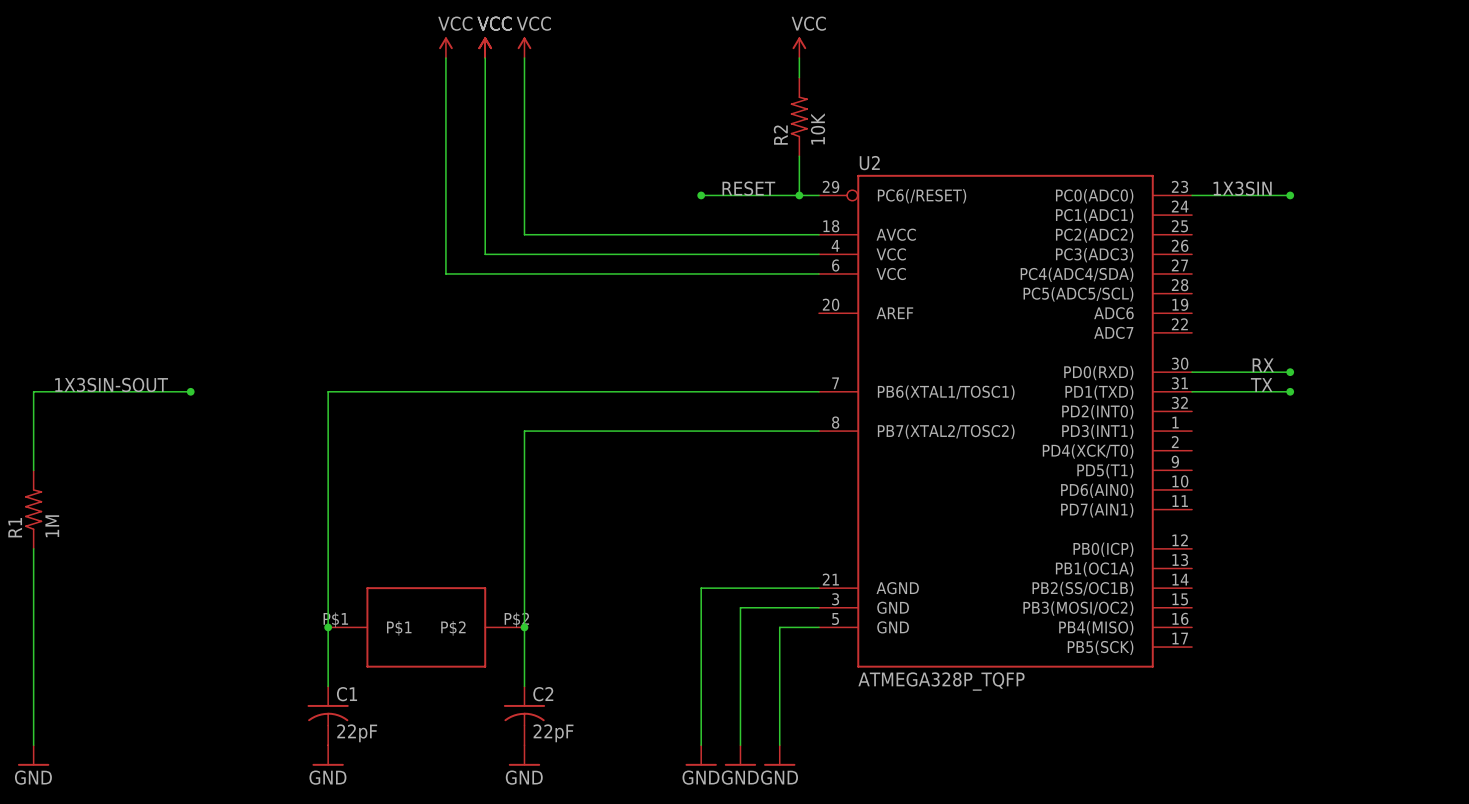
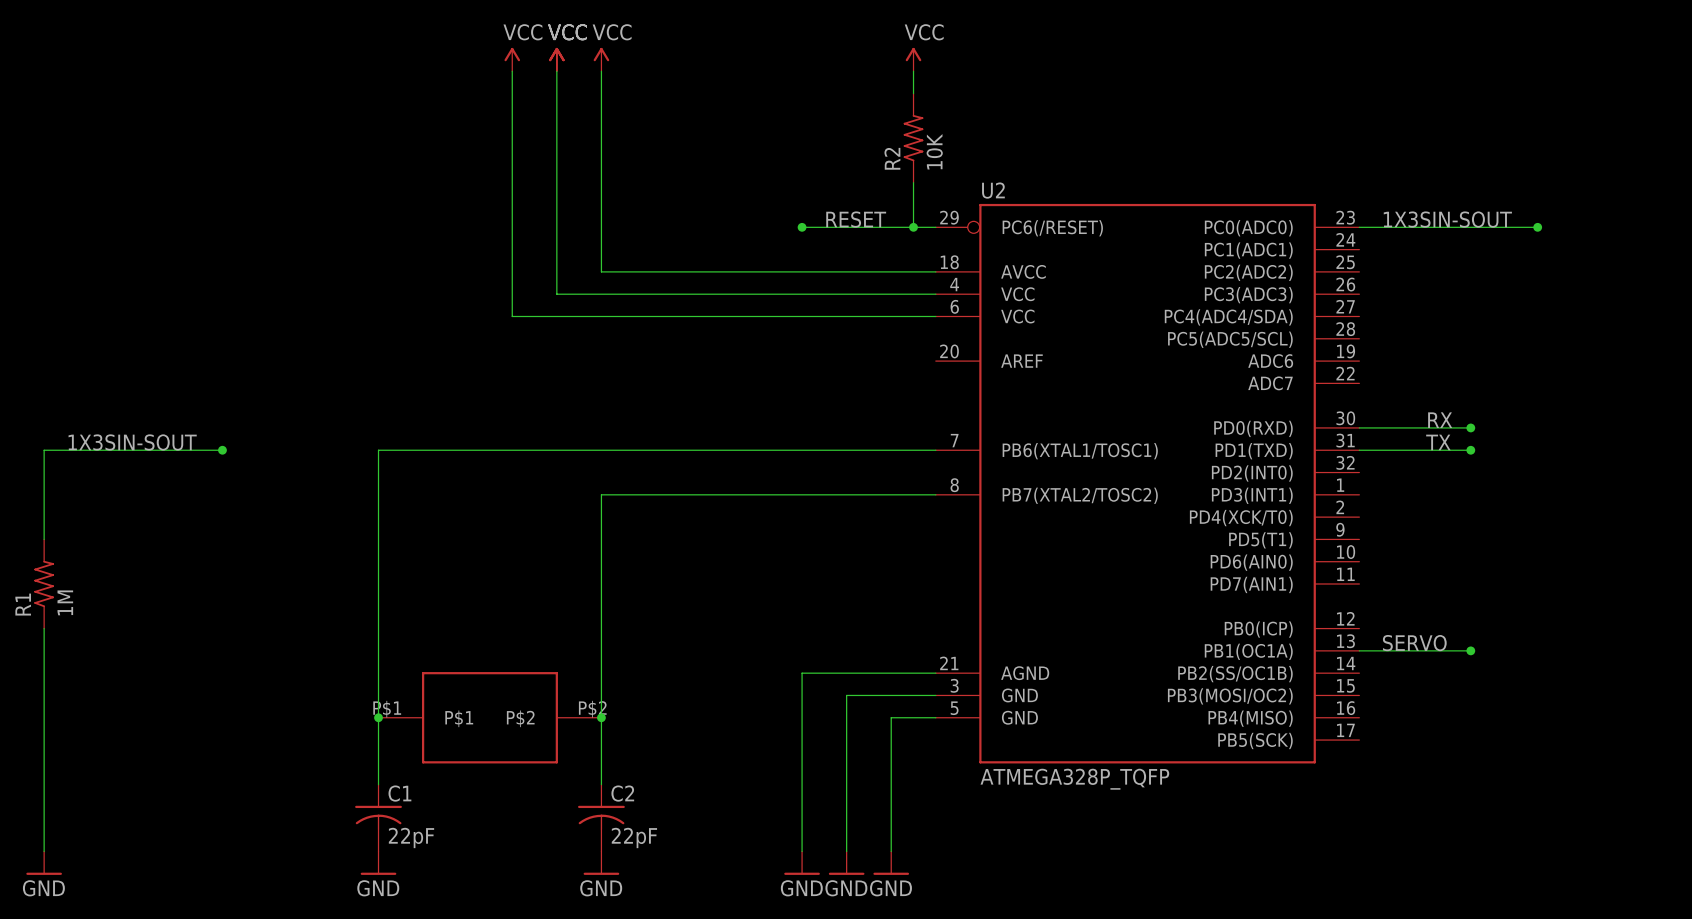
label: 1X3SIN (1242, 188) -> 1X3SIN-SOUT (1447, 219)
wire: none -> (1470, 227) (1537, 227)
junction: (1290, 195) -> none
junction: none -> (1537, 227)
label: none -> SERVO (1414, 643)
wire: none -> (1359, 650) (1470, 650)
junction: none -> (1470, 650)

